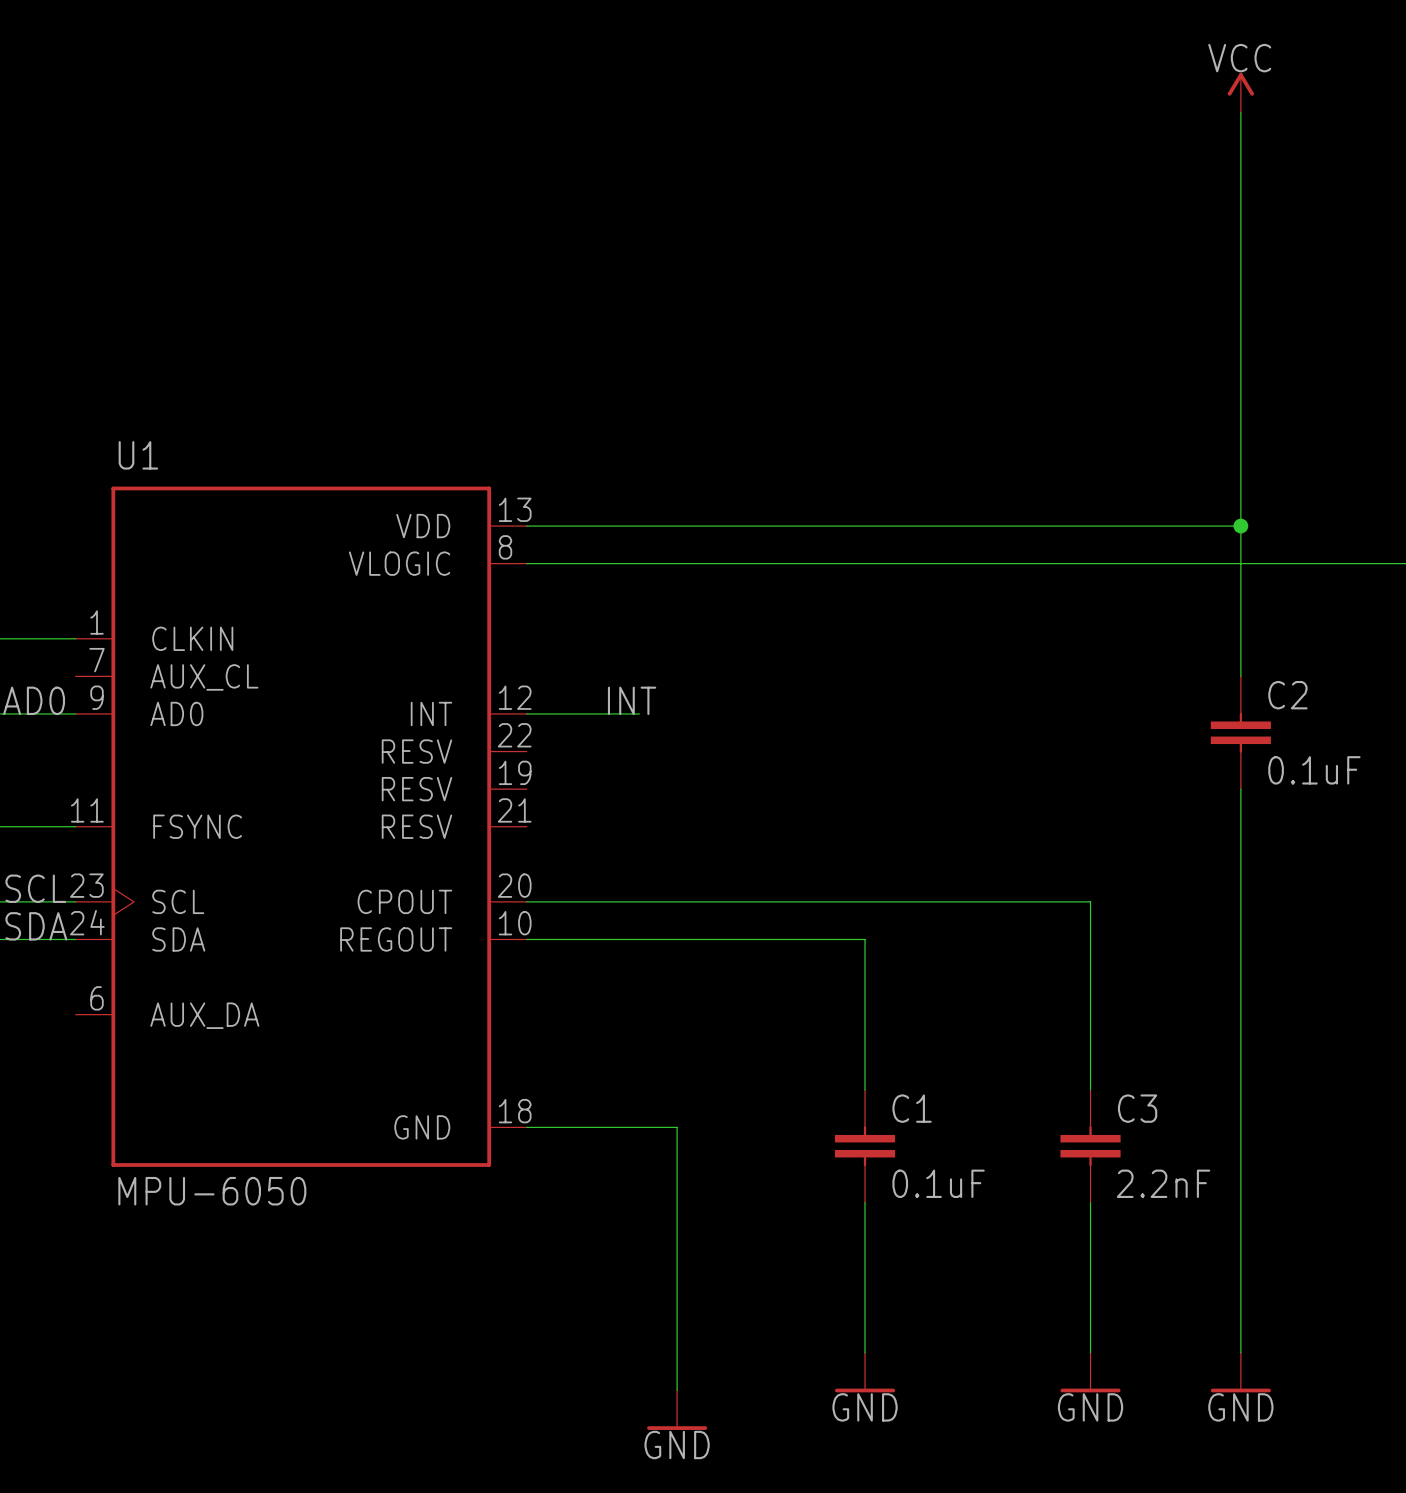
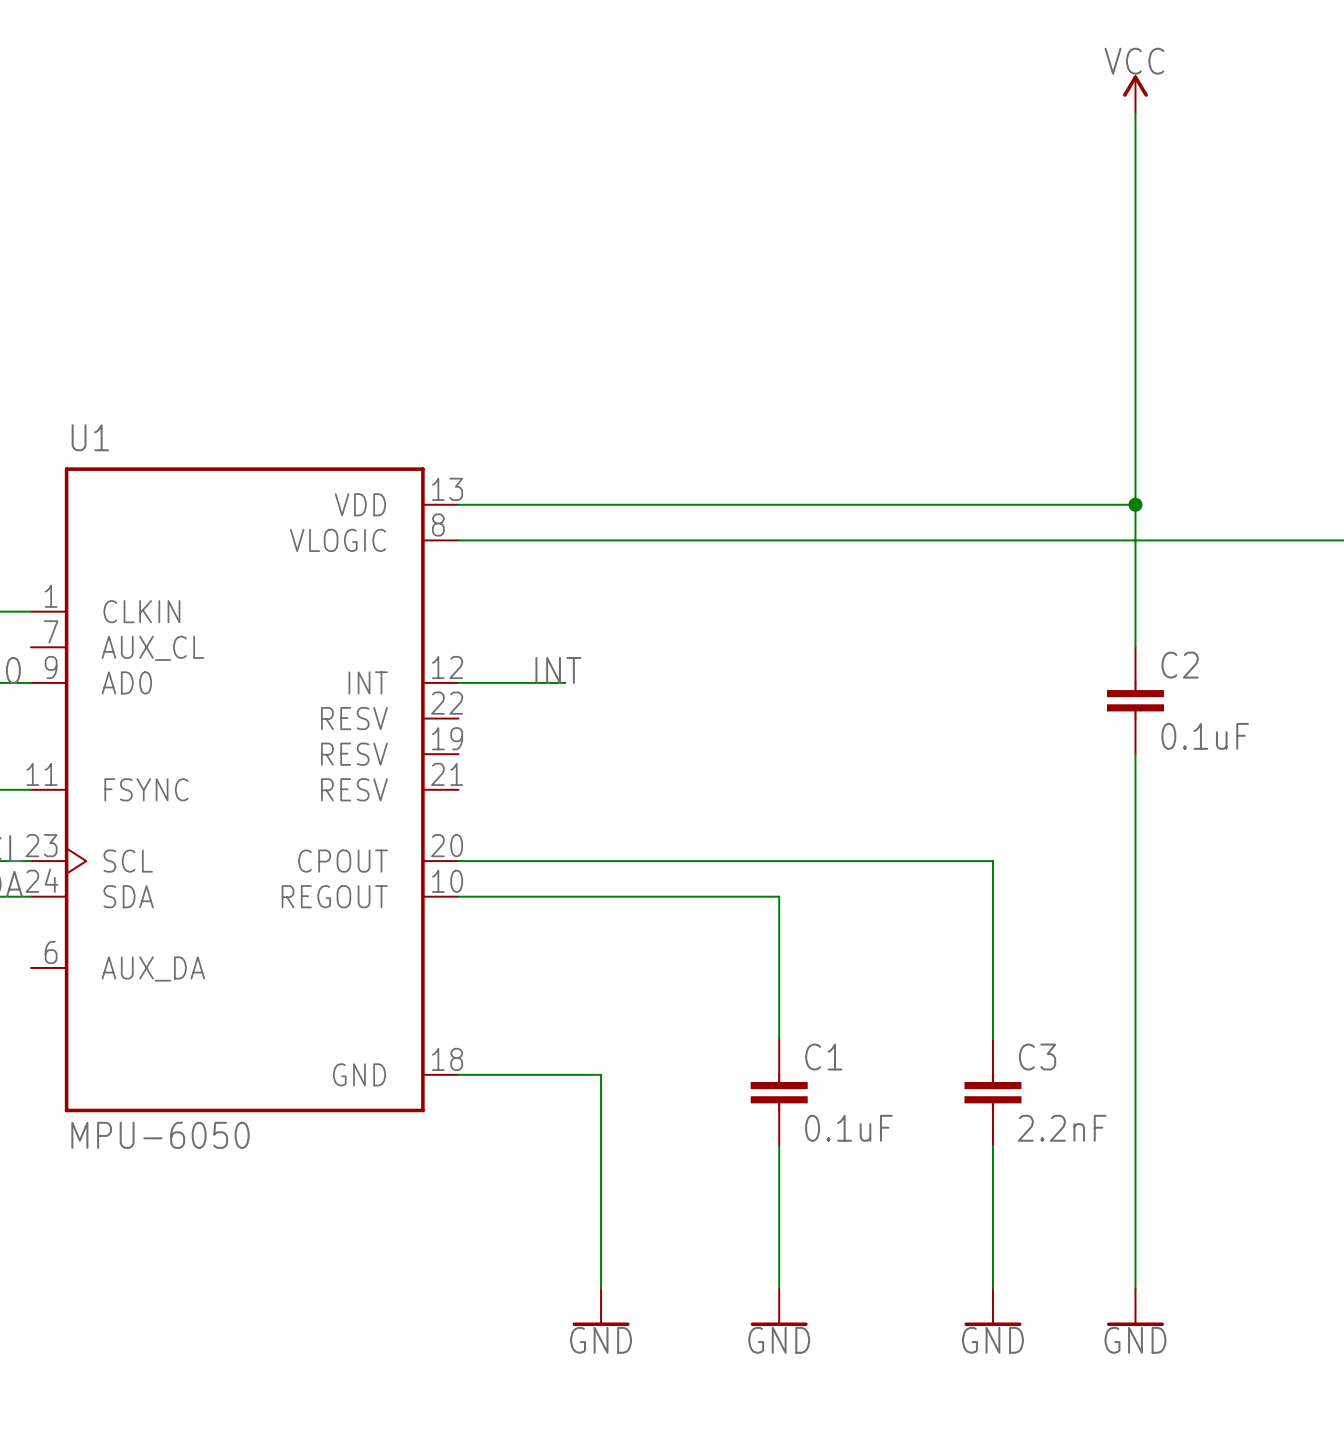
power symbol position: GND (677, 1410) -> GND (601, 1307)

